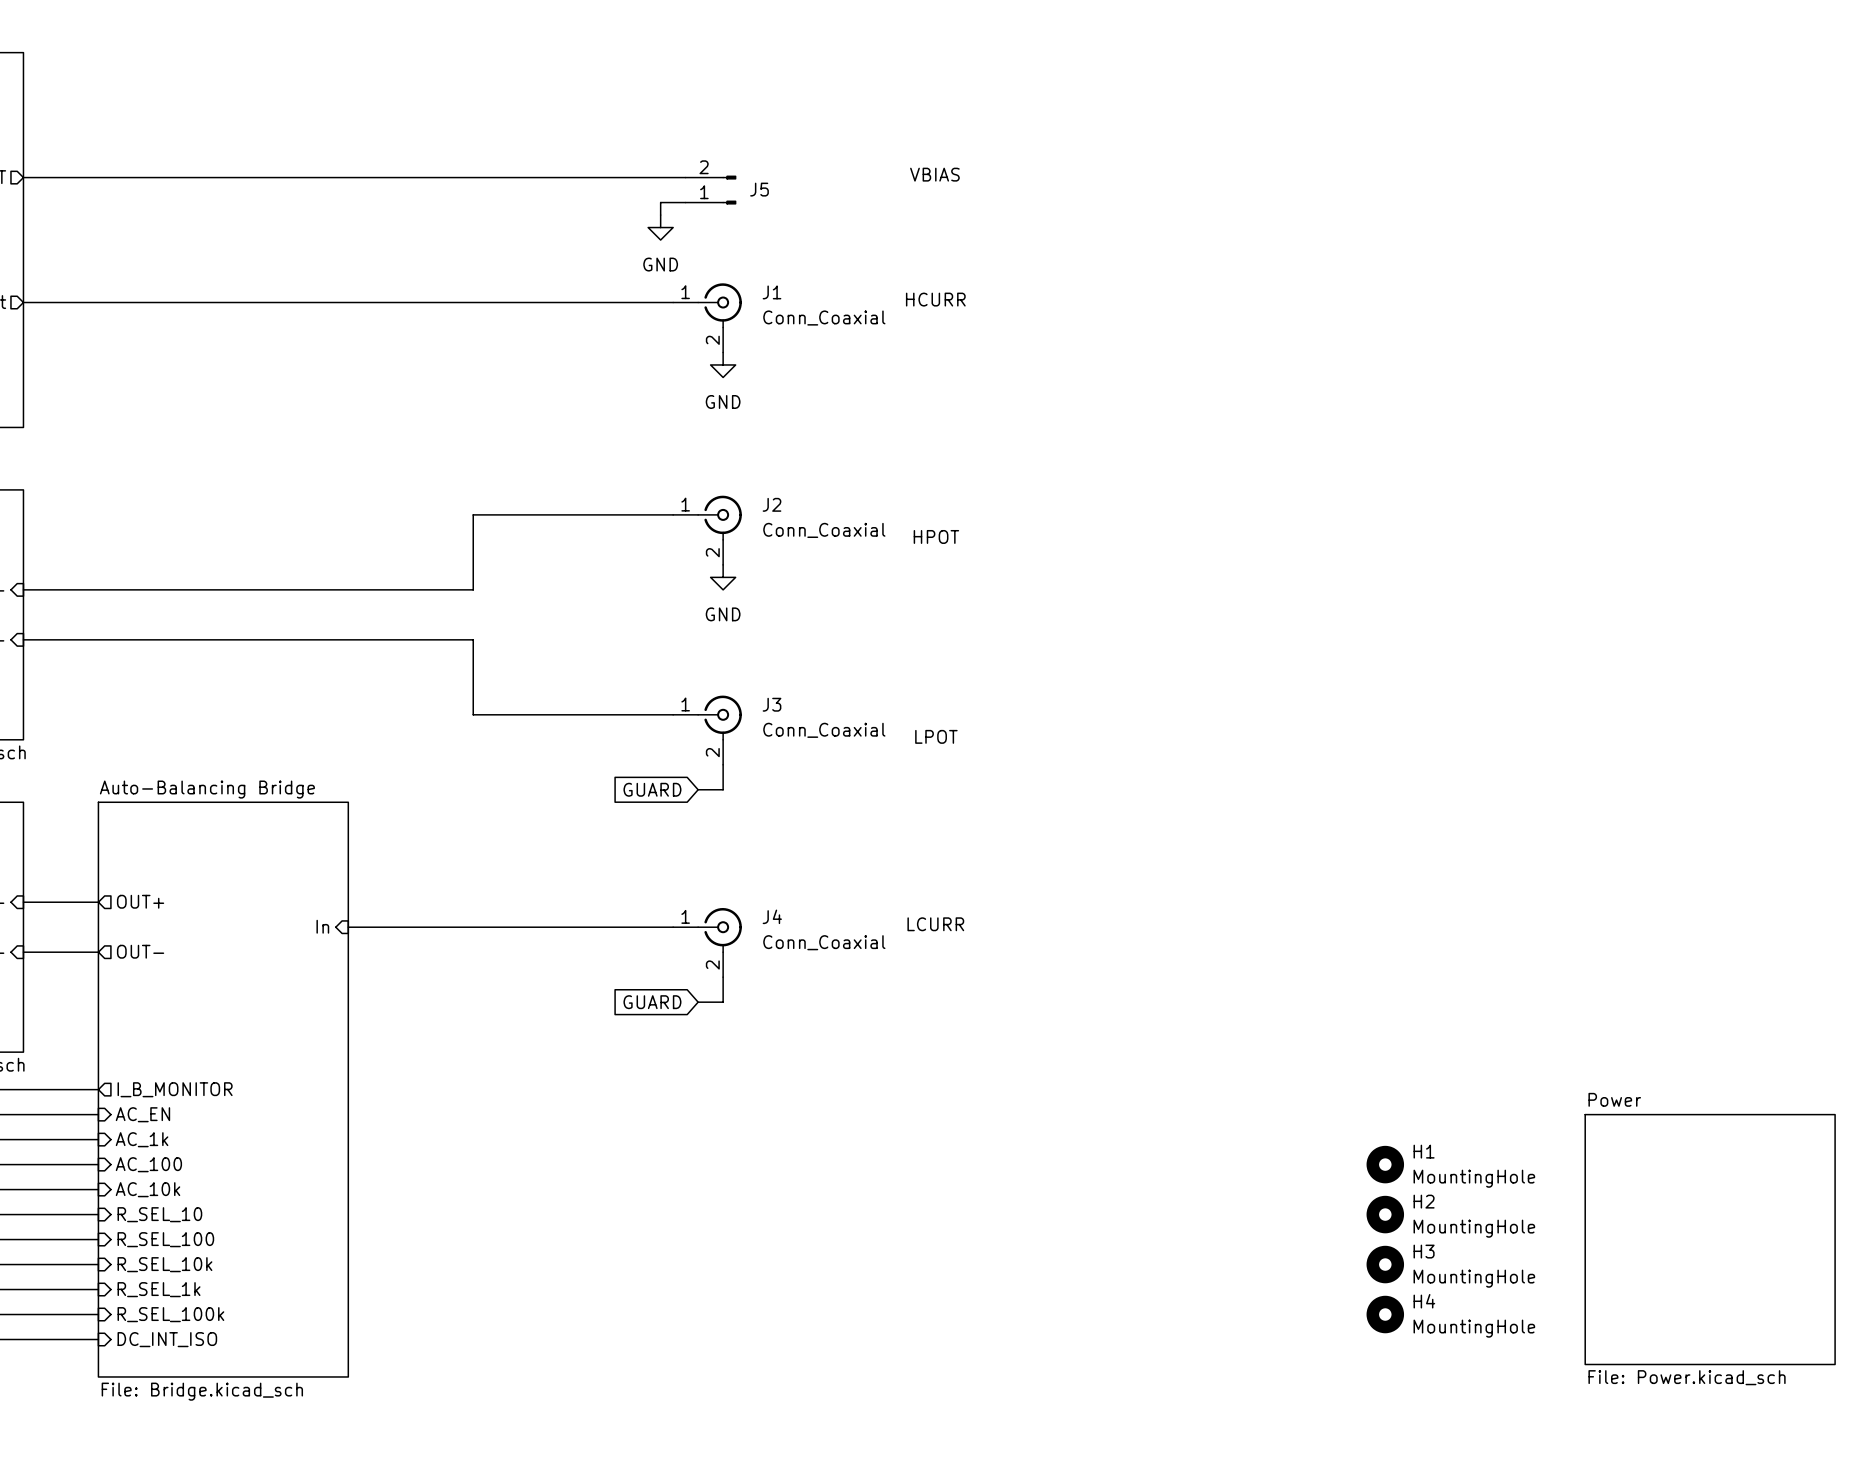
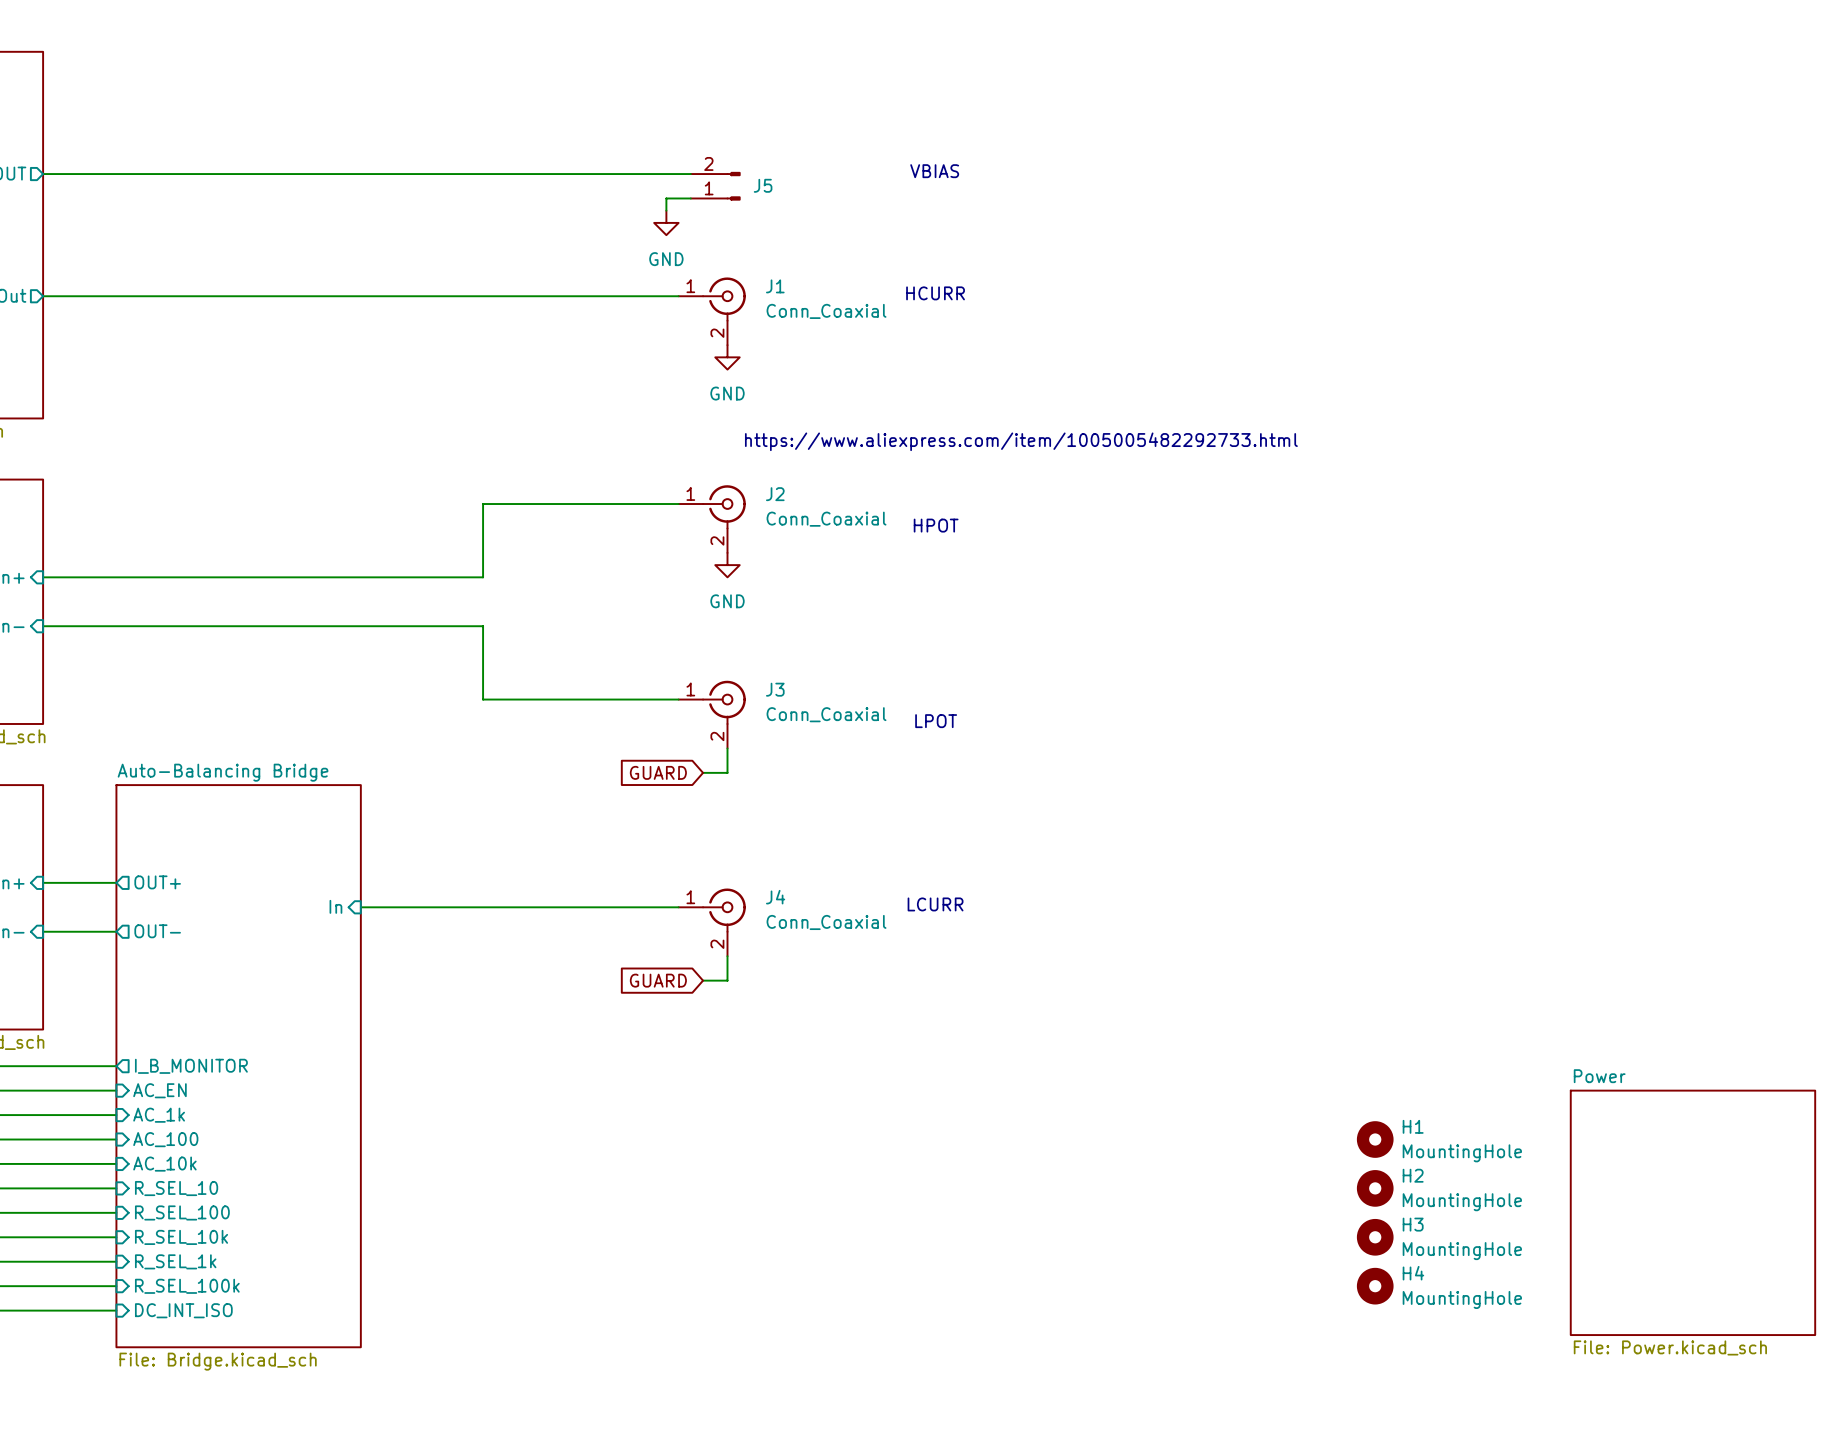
text: none -> https://www.aliexpress.com/item/1005005482292733.html (1021, 441)

